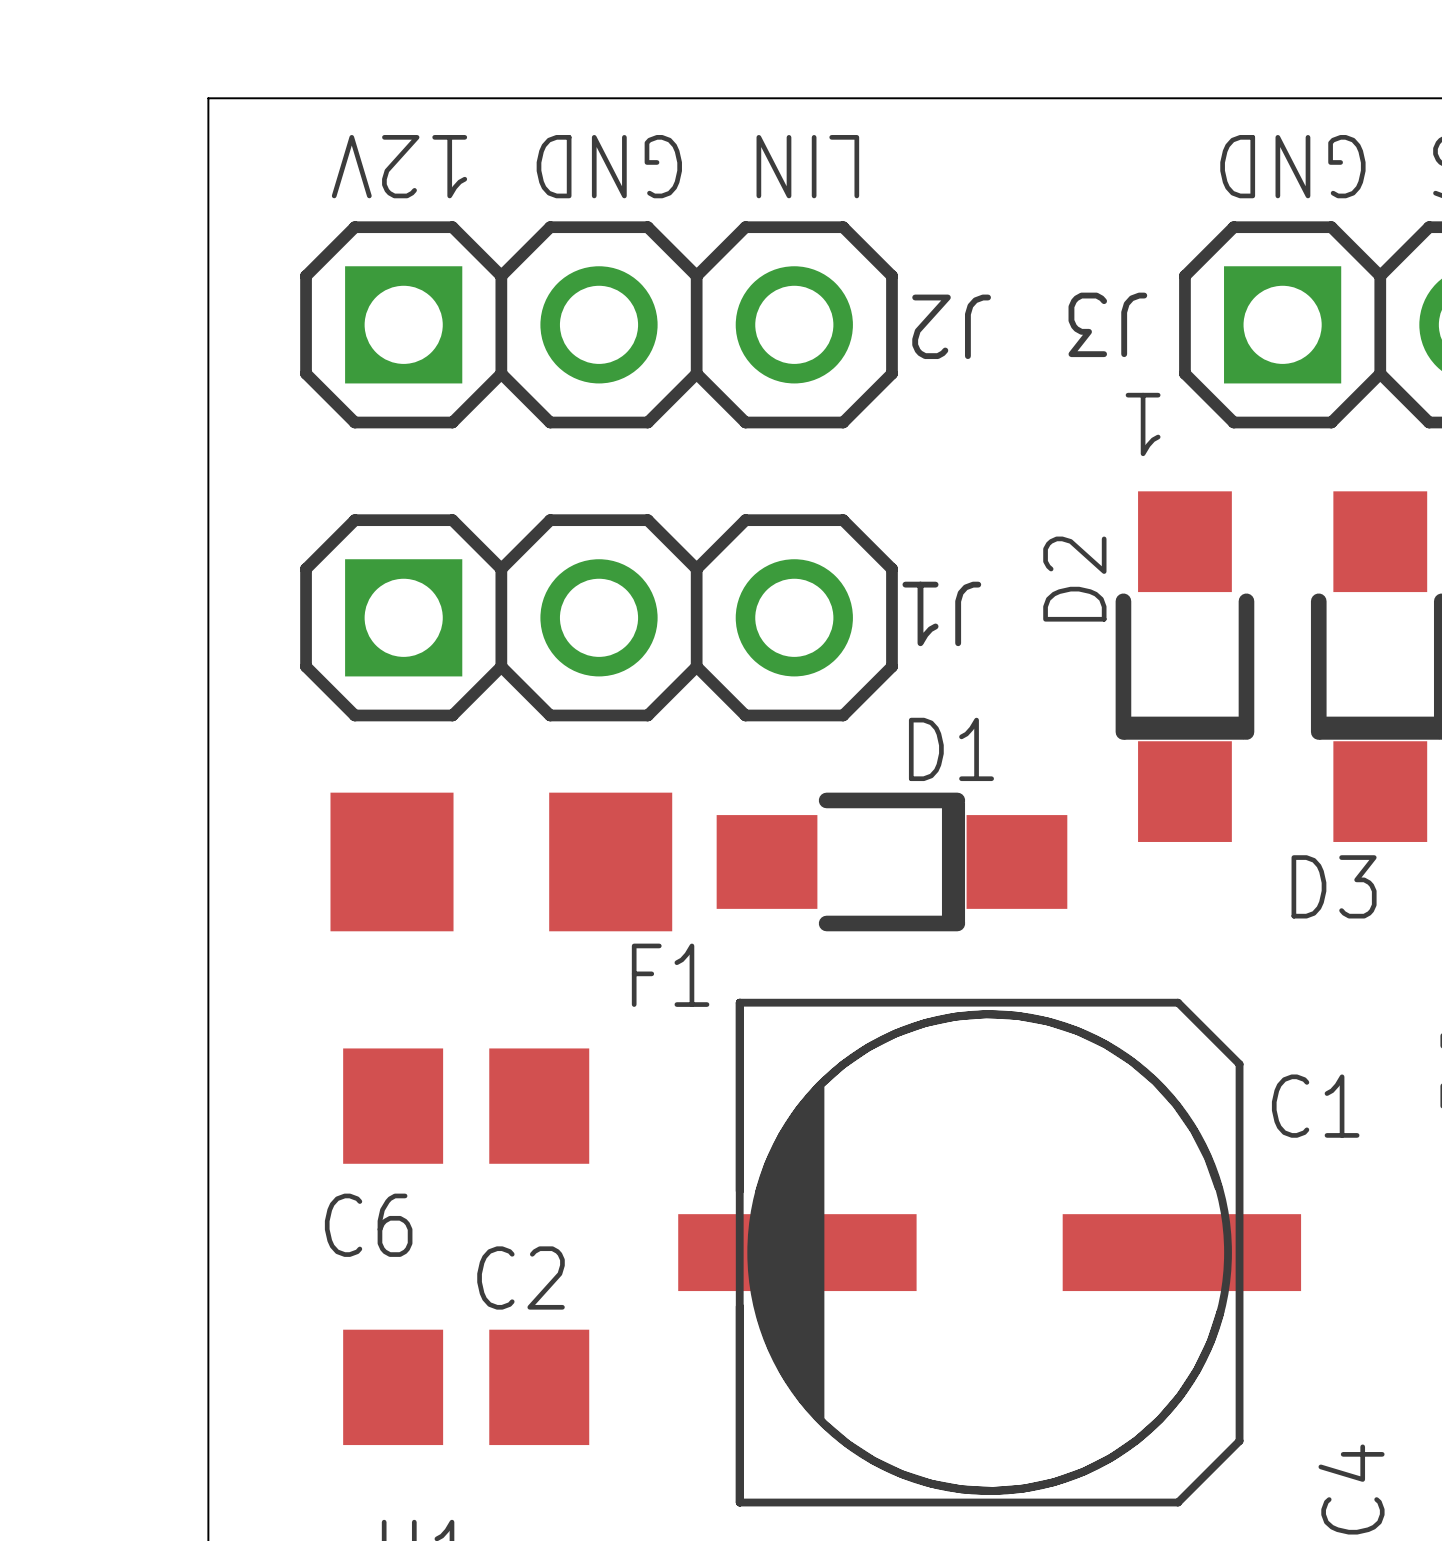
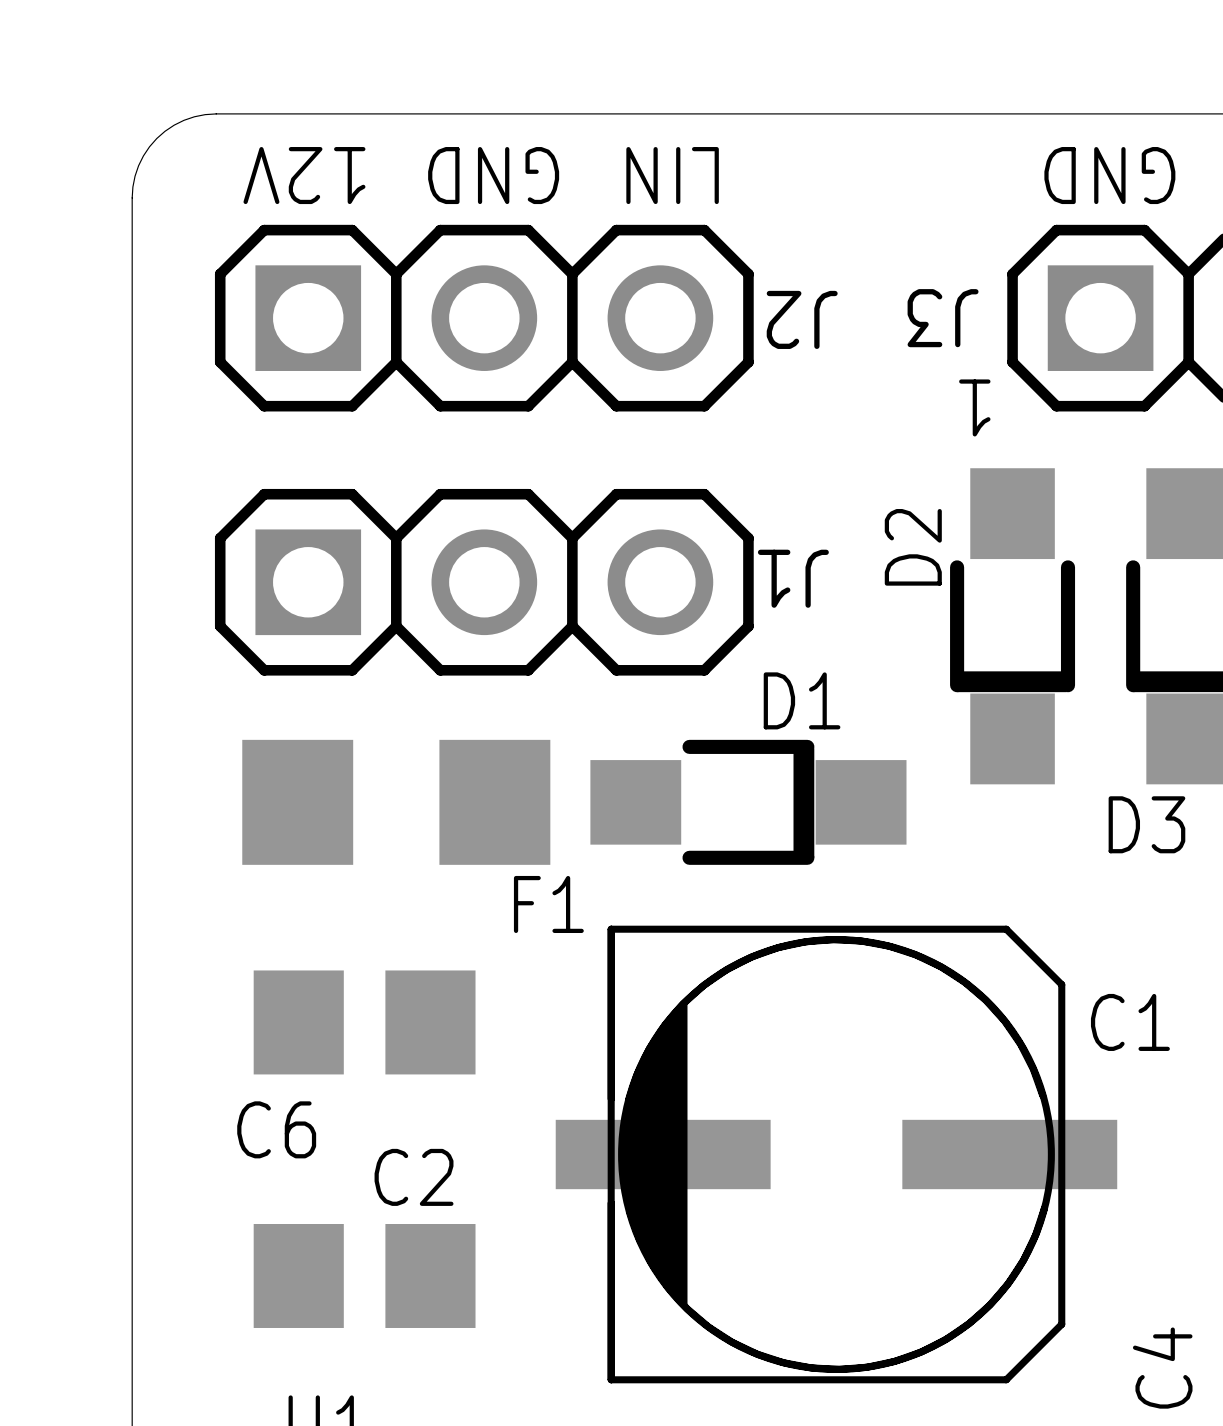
board edge: (301, 98) (208, 98) (208, 191) -> (216, 113) (184, 120) (156, 138) (138, 165) (132, 197)

